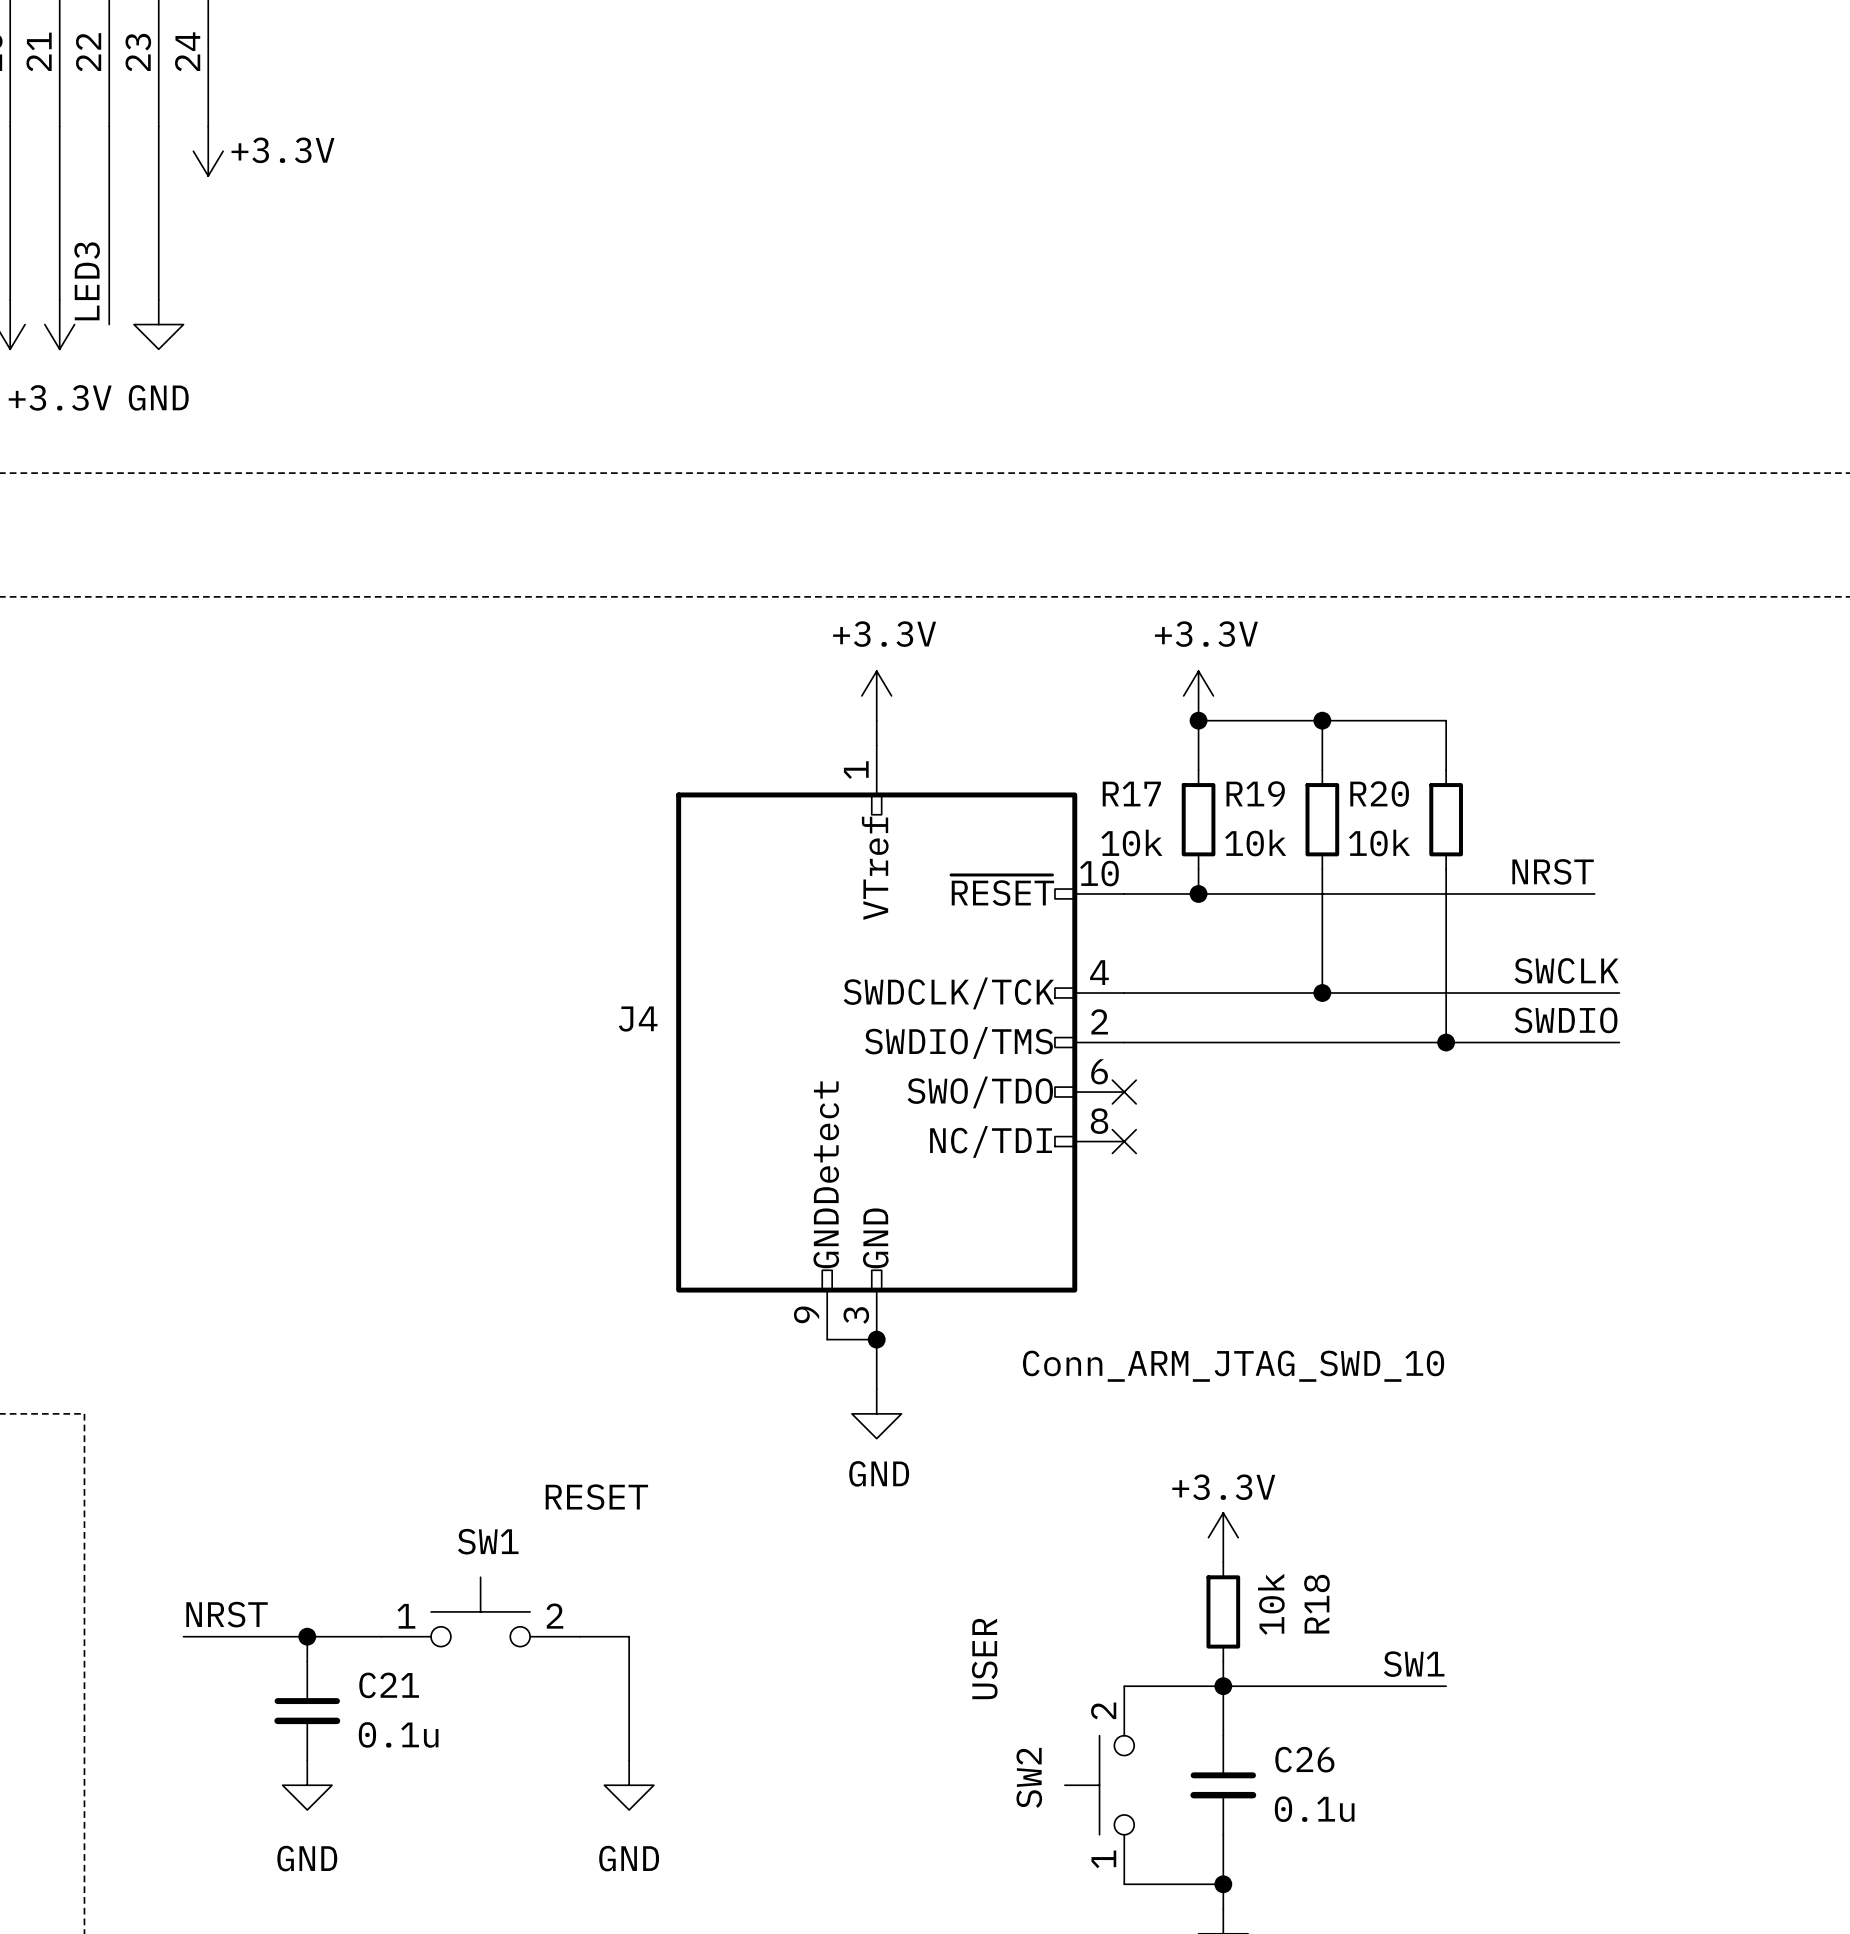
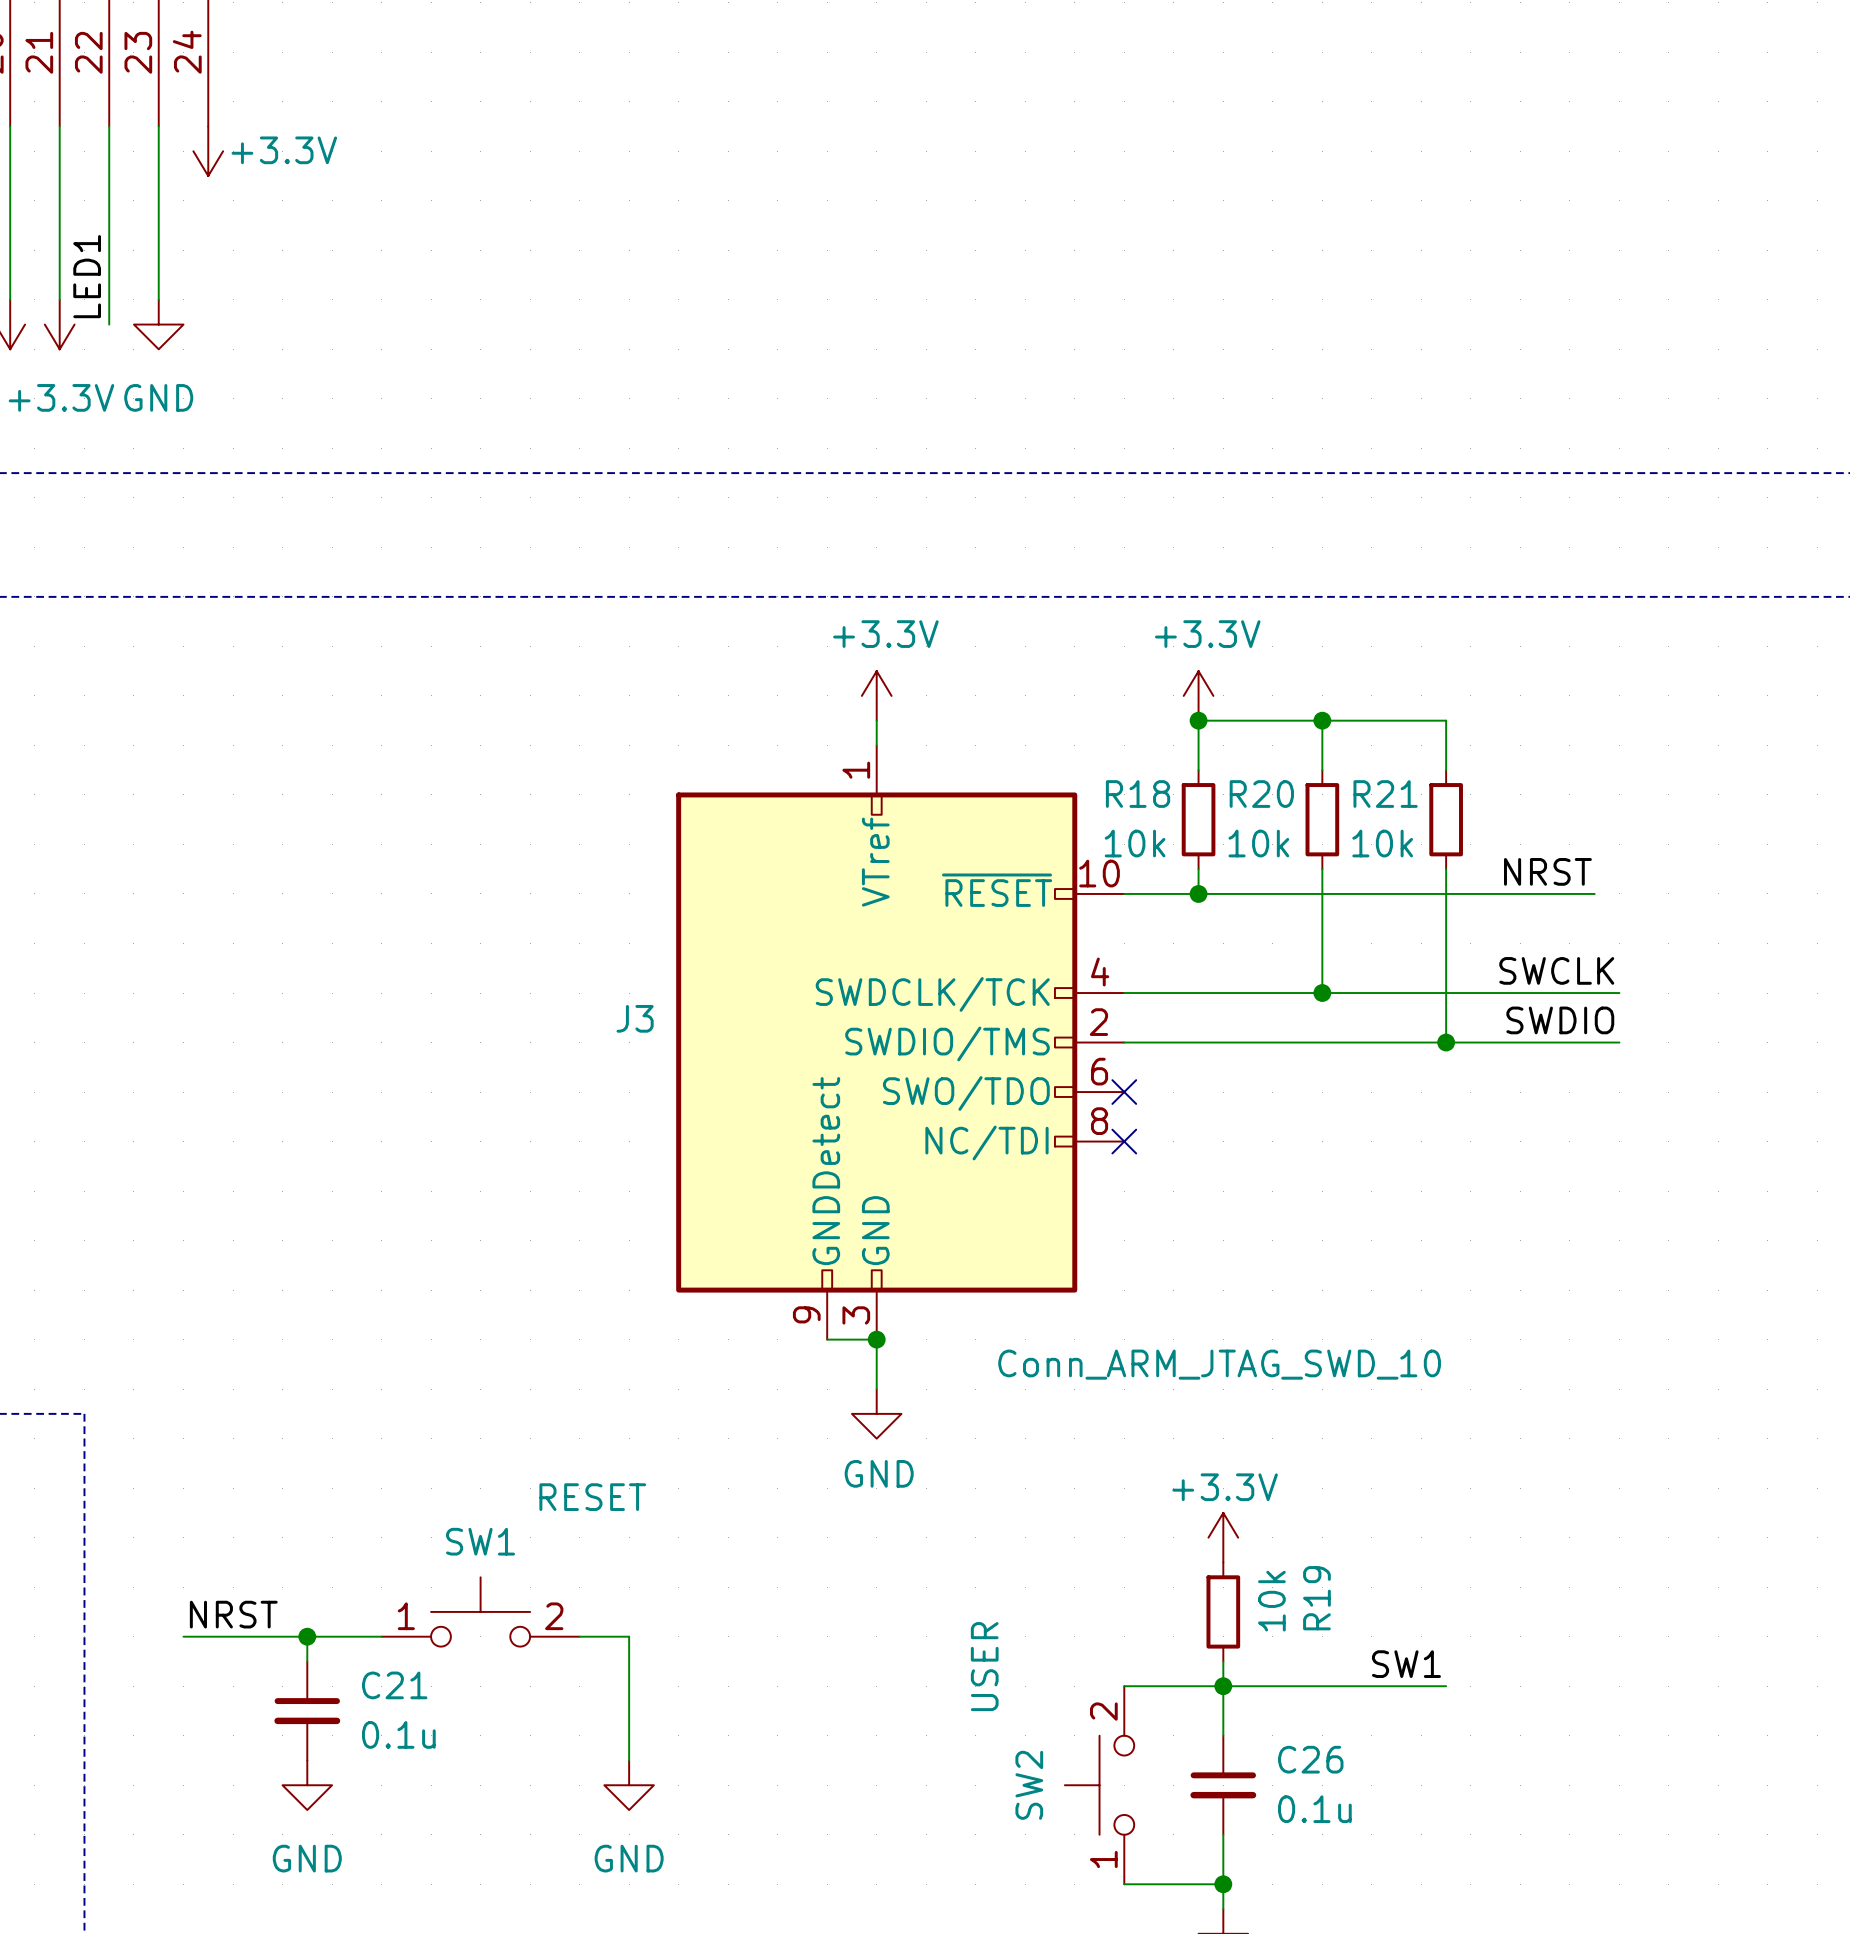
label: LED3 (87, 281) -> LED1 (87, 276)
R19 name: R19 (1255, 793) -> R20 (1261, 794)
R17 name: R17 (1131, 794) -> R18 (1138, 794)
R20 name: R20 (1379, 794) -> R21 (1385, 794)
J4 name: J4 (638, 1019) -> J3 (635, 1018)
R18 name: R18 (1316, 1604) -> R19 (1316, 1598)

